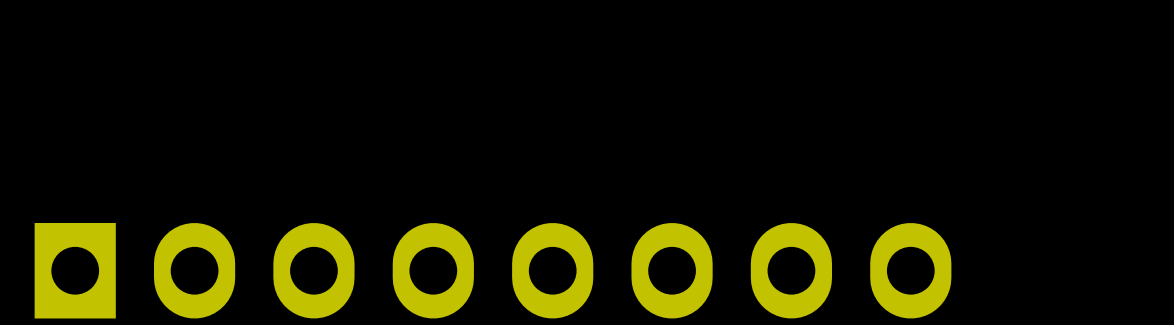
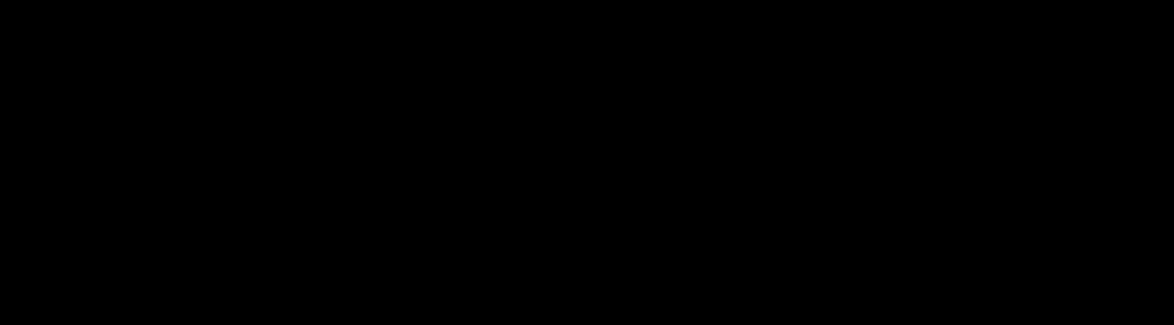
part: (493, 270) -> none

